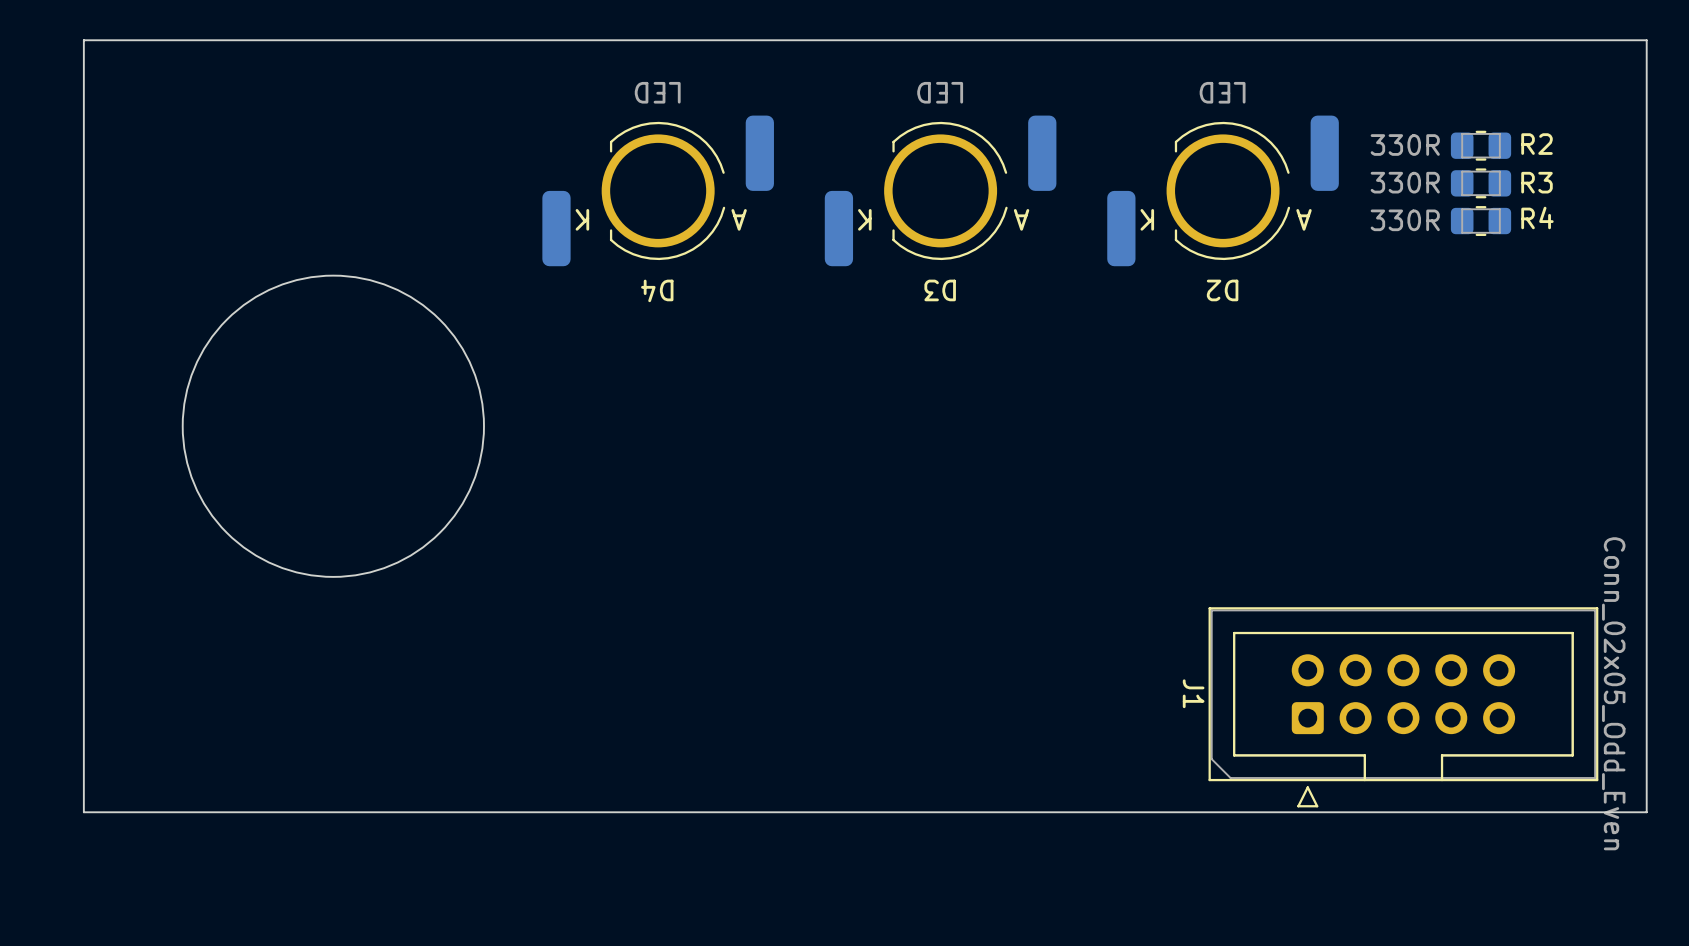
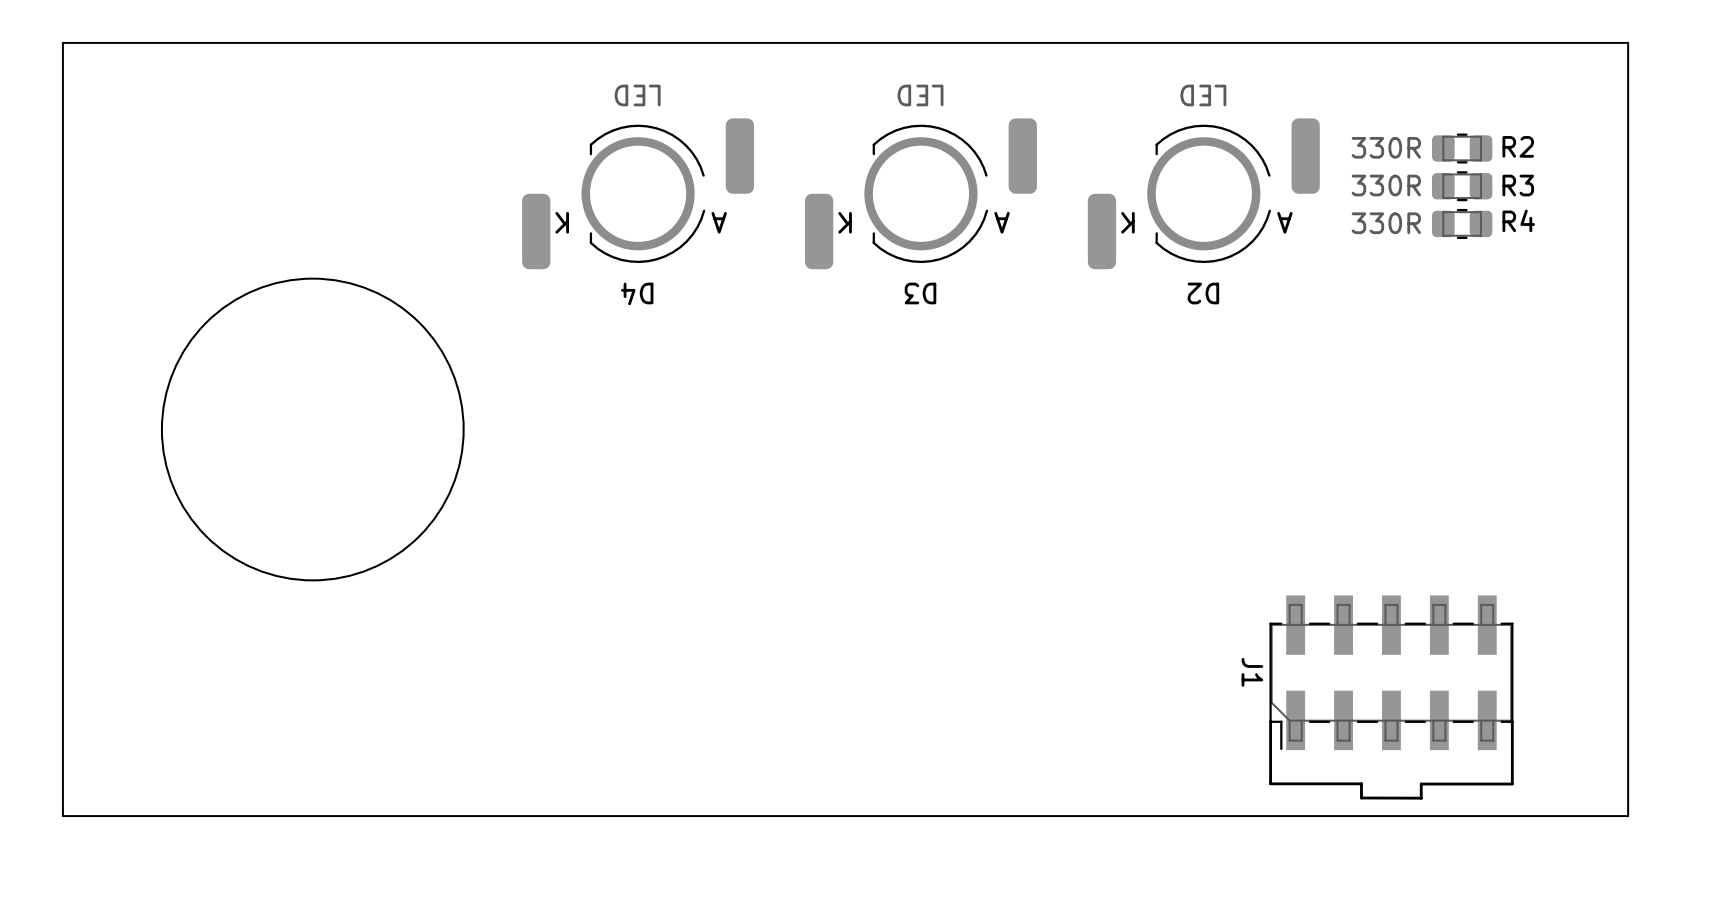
J1 footprint: [1208, 607, 1599, 808] -> [1269, 595, 1514, 751]
J1 name position: J1 (1193, 693) -> J1 (1252, 672)
J1 value: Conn_02x05_Odd_Even (1613, 693) -> none
line: none -> (1270, 721) (1270, 783)
line: none -> (1512, 721) (1512, 783)
line: none -> (1270, 783) (1361, 783) (1361, 797) (1421, 798) (1421, 784)
line: none -> (1512, 784) (1421, 784)

